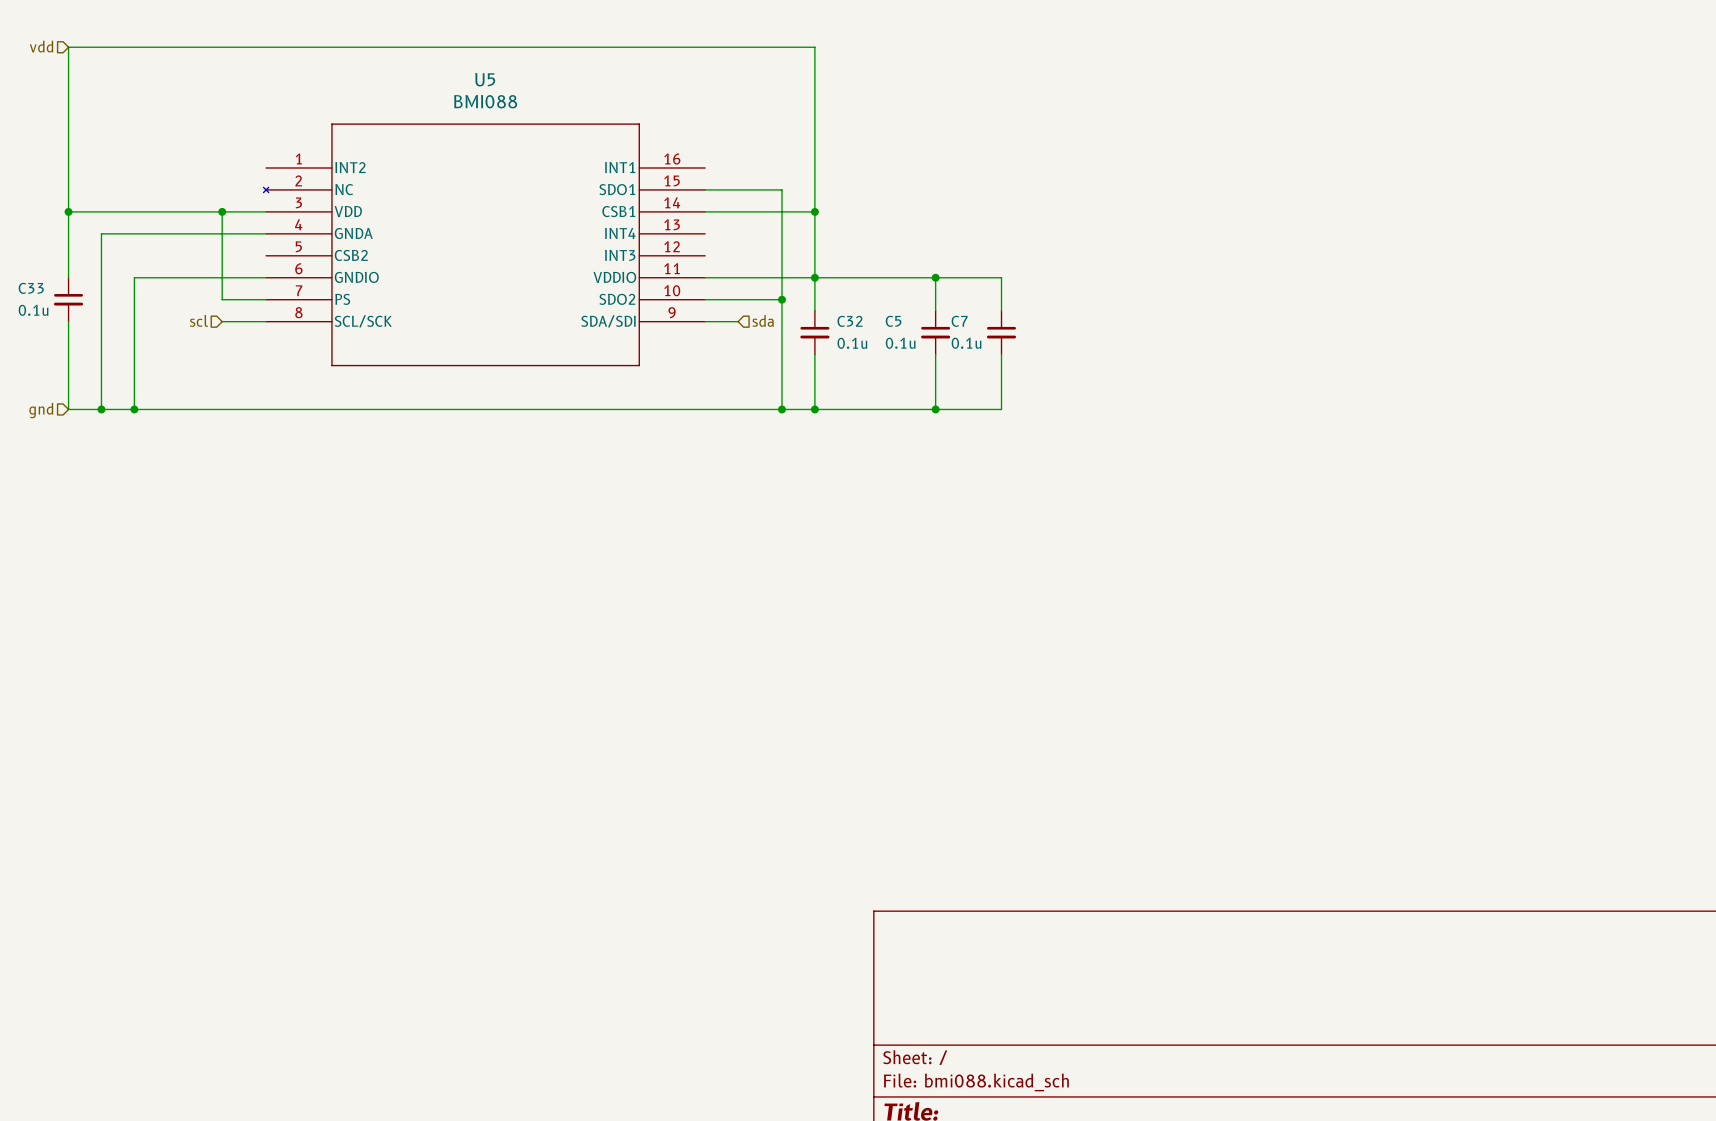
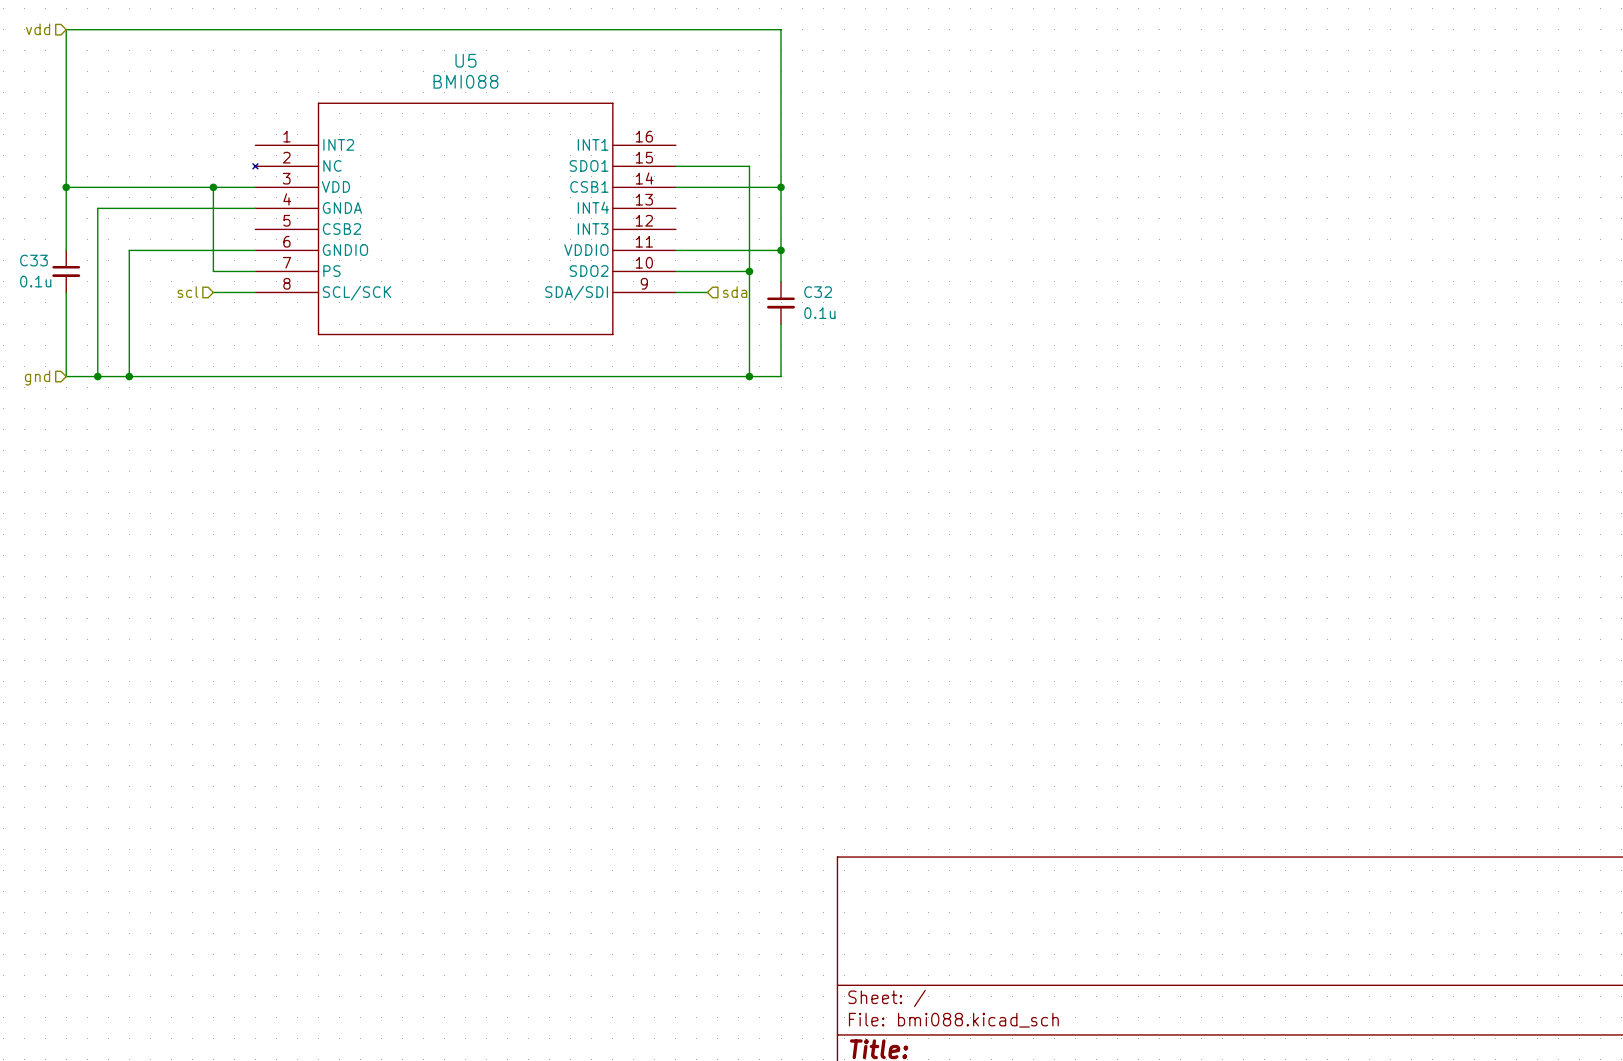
wire: (814, 277) (1001, 277) (1001, 310) -> none
wire: (935, 277) (935, 310) -> none
junction: (935, 277) -> none
C5: 0.1u (935, 332) -> none
C7: 0.1u (1001, 332) -> none
wire: (935, 354) (935, 409) -> none
wire: (1001, 354) (1001, 409) (814, 409) -> none
junction: (814, 409) -> none
junction: (935, 409) -> none

